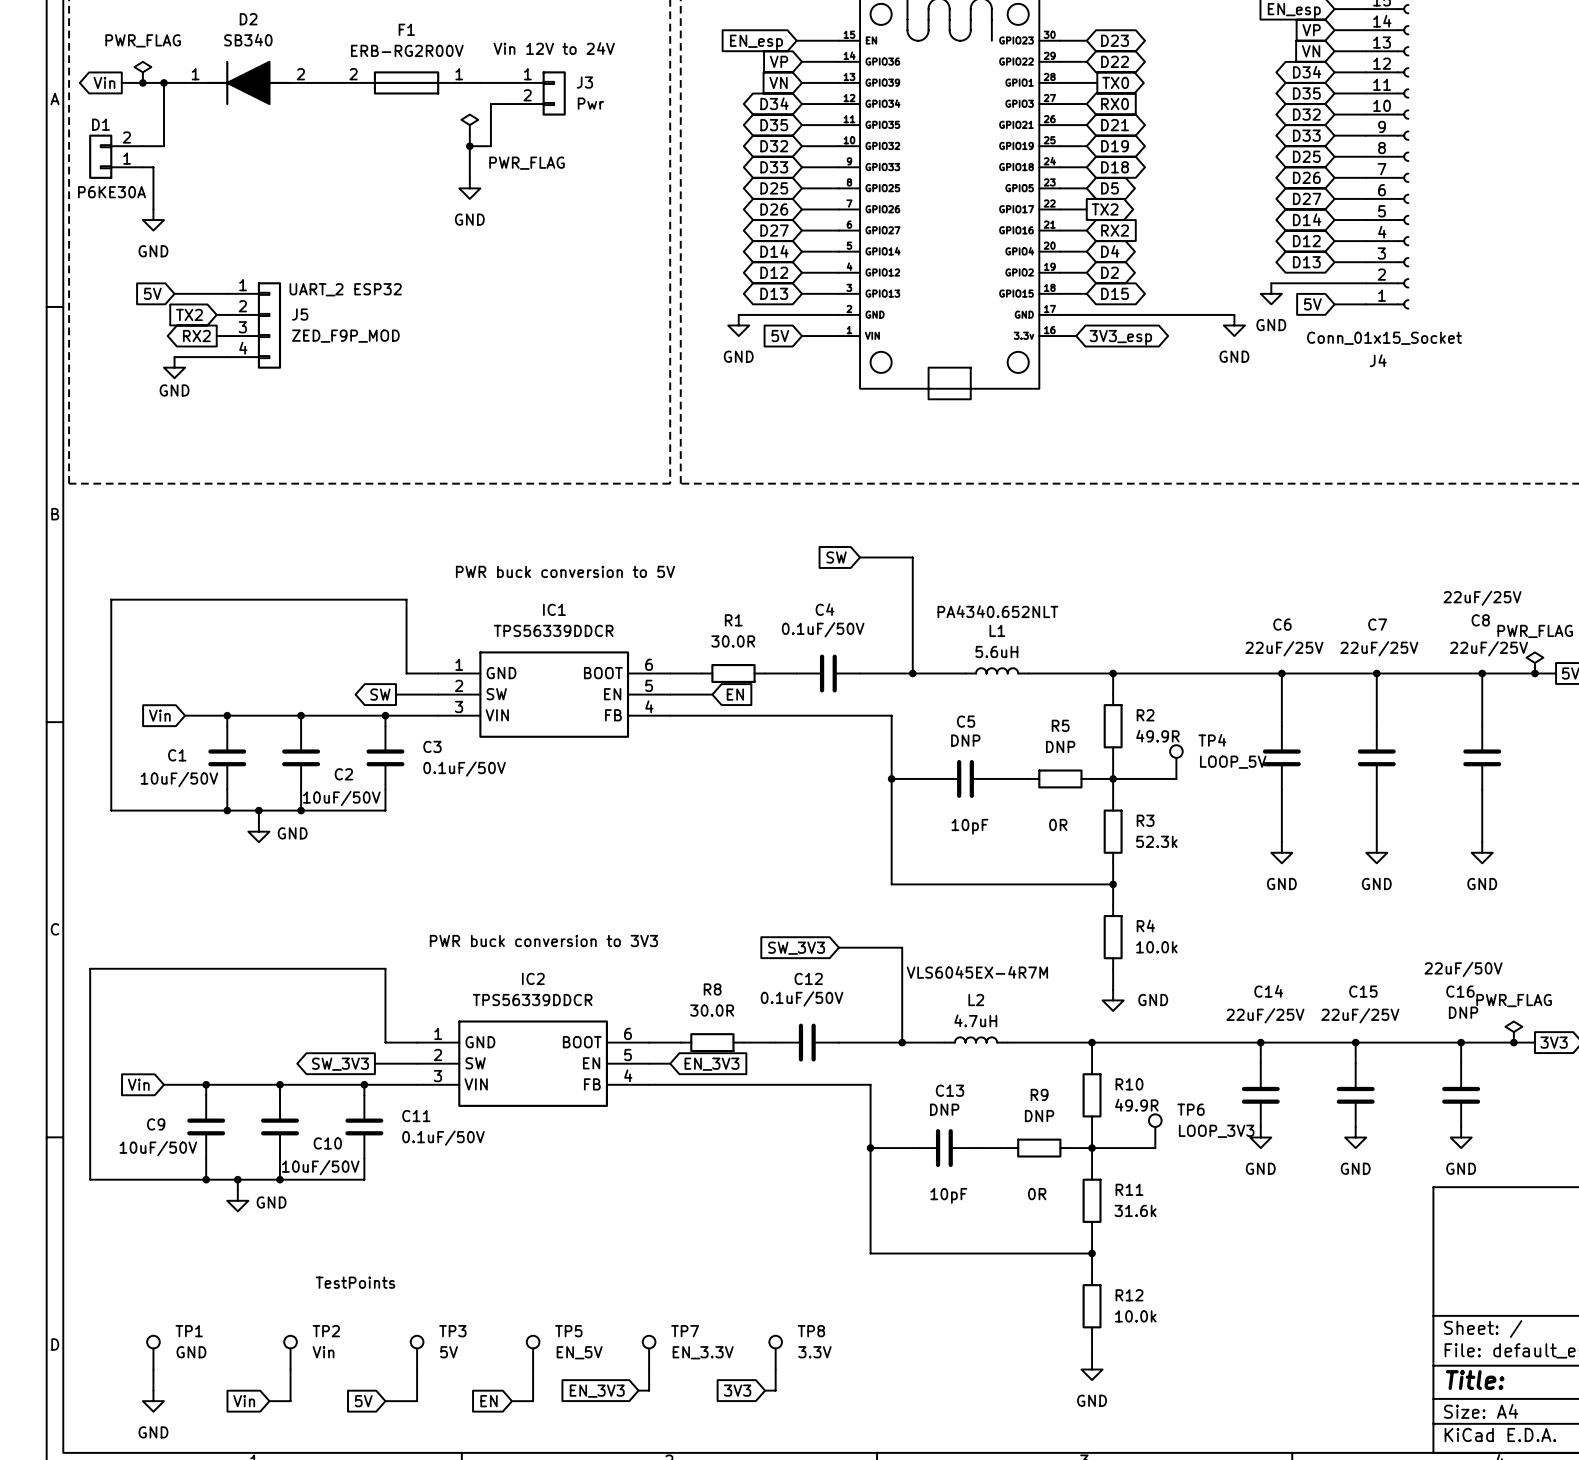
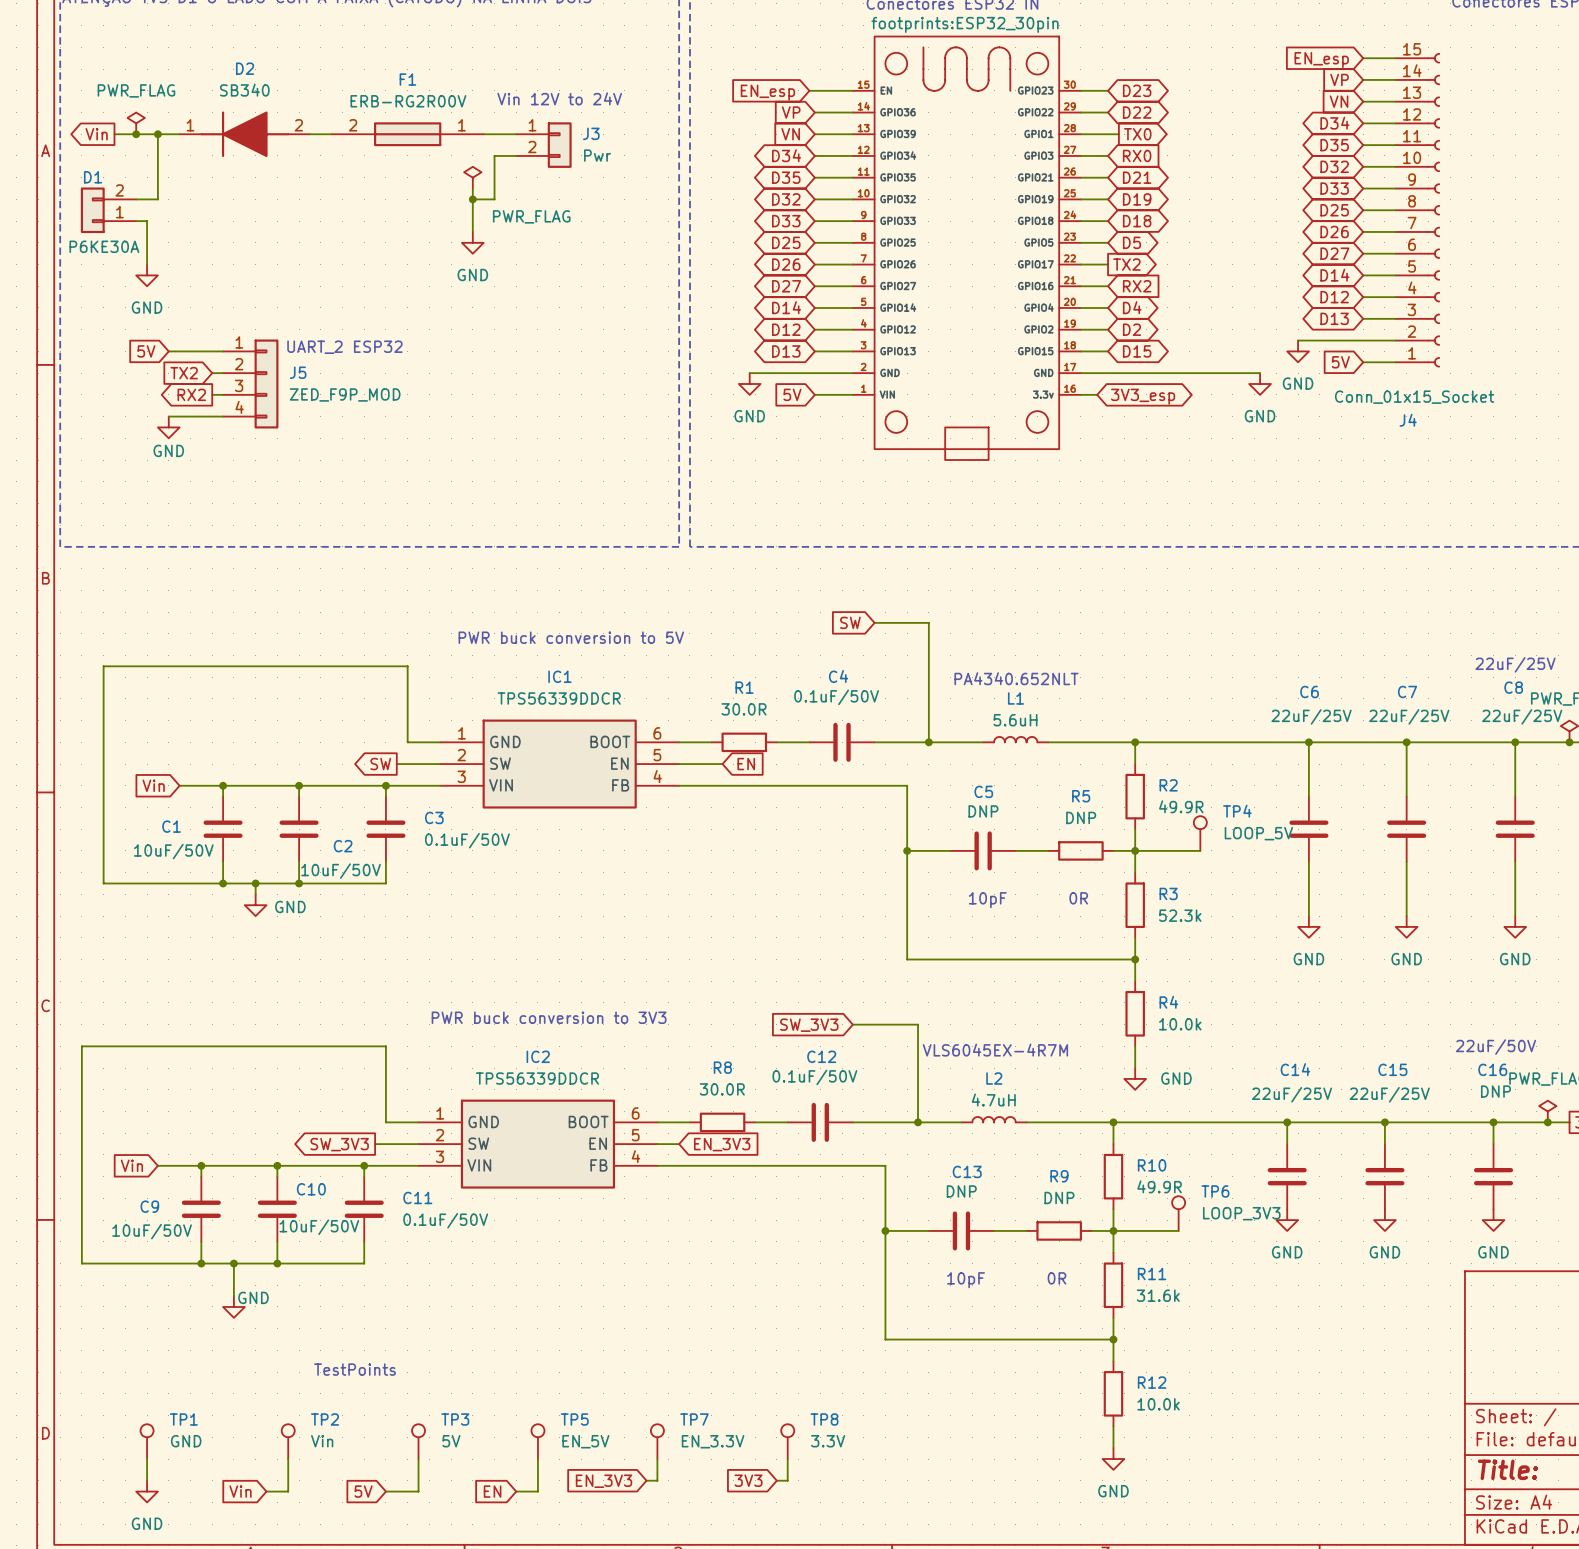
C10 name position: C10 (327, 1143) -> C10 (311, 1189)
C10 value position: 10uF/50V (320, 1167) -> 10uF/50V (319, 1227)
power symbol position: GND (237, 1200) -> GND (233, 1306)
power symbol text position: GND (271, 1202) -> GND (253, 1297)

